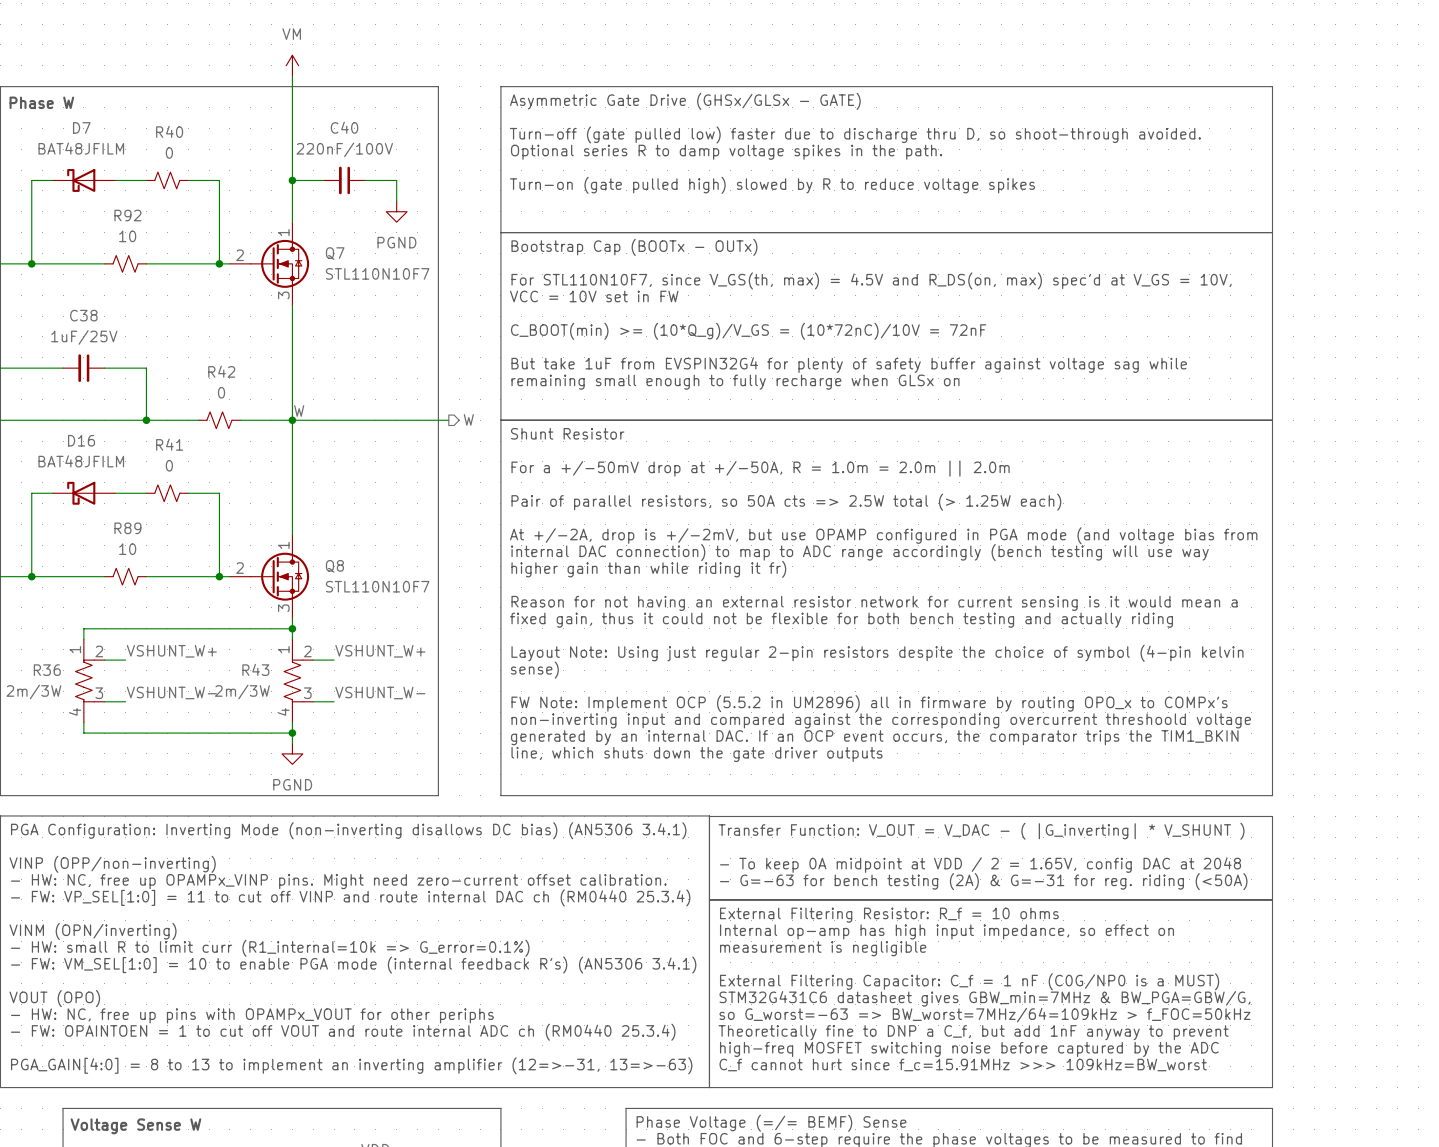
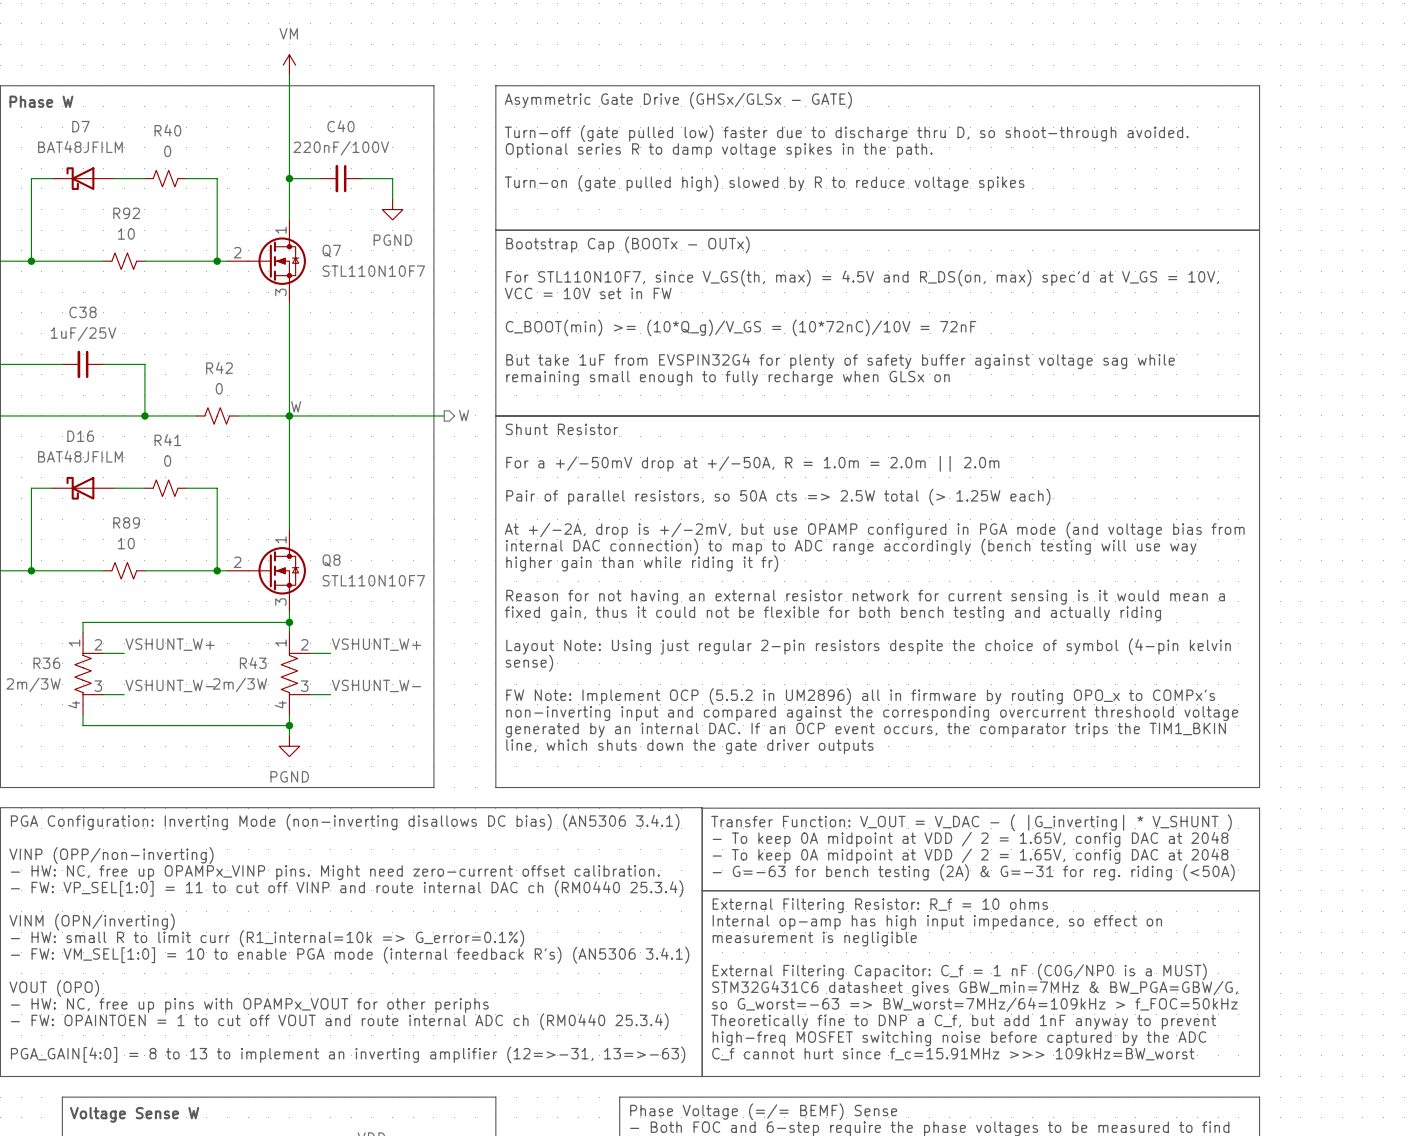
text: none -> - To keep 0A midpoint at VDD / 2 = 1.65V, config DAC at 2048 (970, 839)

